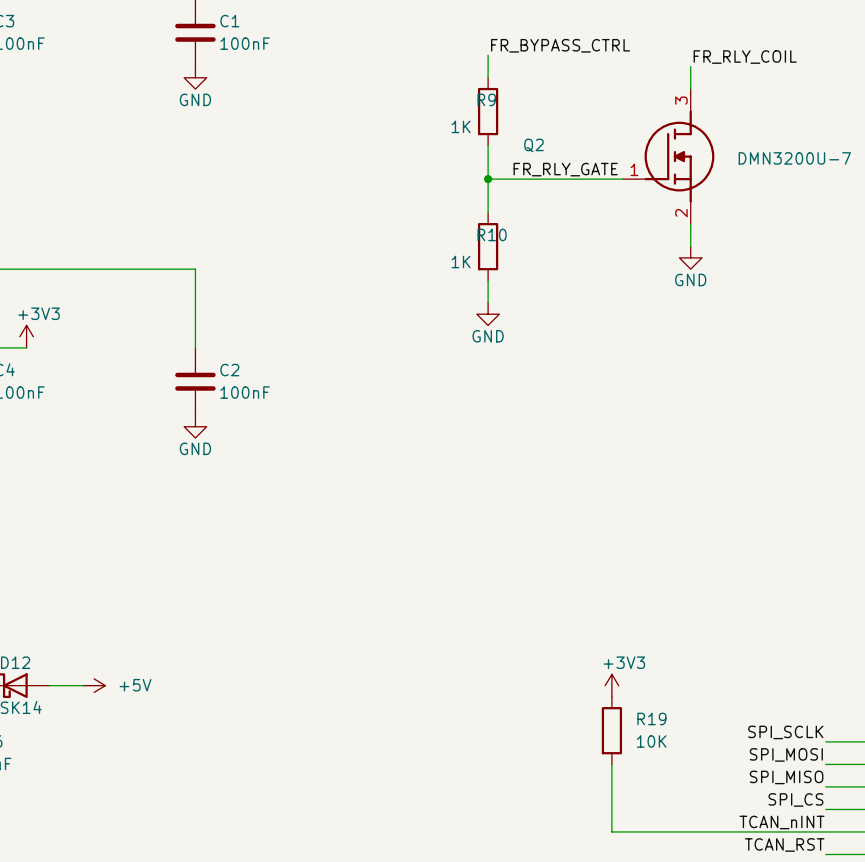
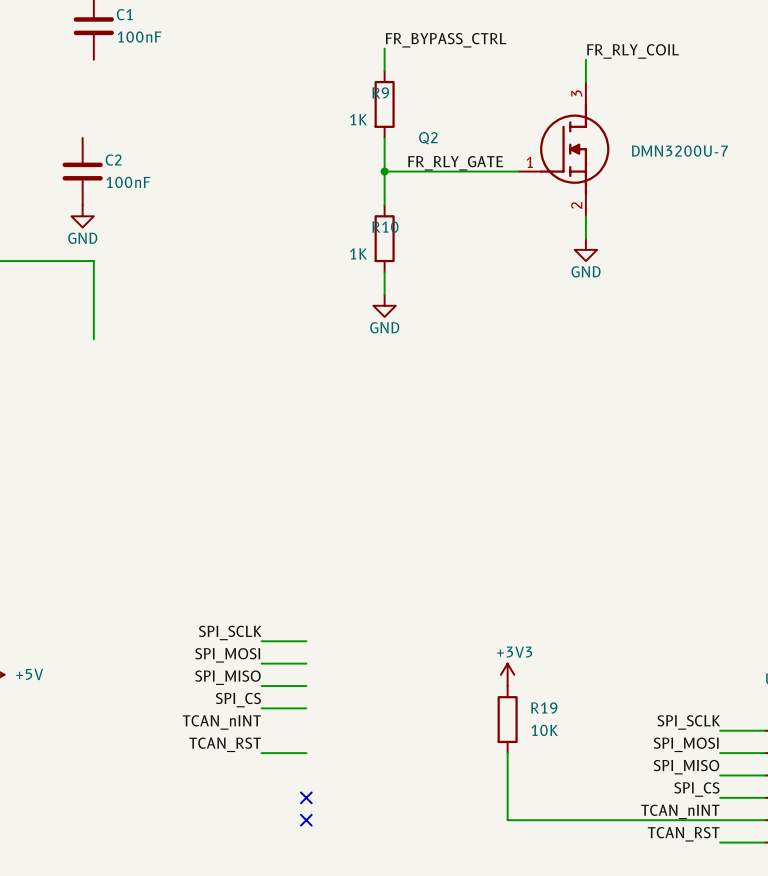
power symbol: GND (195, 77) -> none
power symbol: none -> GND (82, 216)
C2 position: (195, 381) -> (82, 171)
power symbol: GND (195, 426) -> none
label: none -> SPI_SCLK (230, 632)
wire: none -> (261, 641) (306, 641)
label: none -> SPI_MOSI (227, 655)
wire: none -> (261, 663) (306, 663)
label: none -> SPI_MISO (227, 677)
wire: none -> (261, 686) (306, 686)
label: none -> SPI_CS (238, 700)
wire: none -> (261, 708) (306, 708)
label: none -> TCAN_nINT (221, 722)
label: none -> TCAN_RST (225, 744)
wire: none -> (261, 753) (306, 753)
no-connect mark: none -> (306, 797)
no-connect mark: none -> (306, 820)

